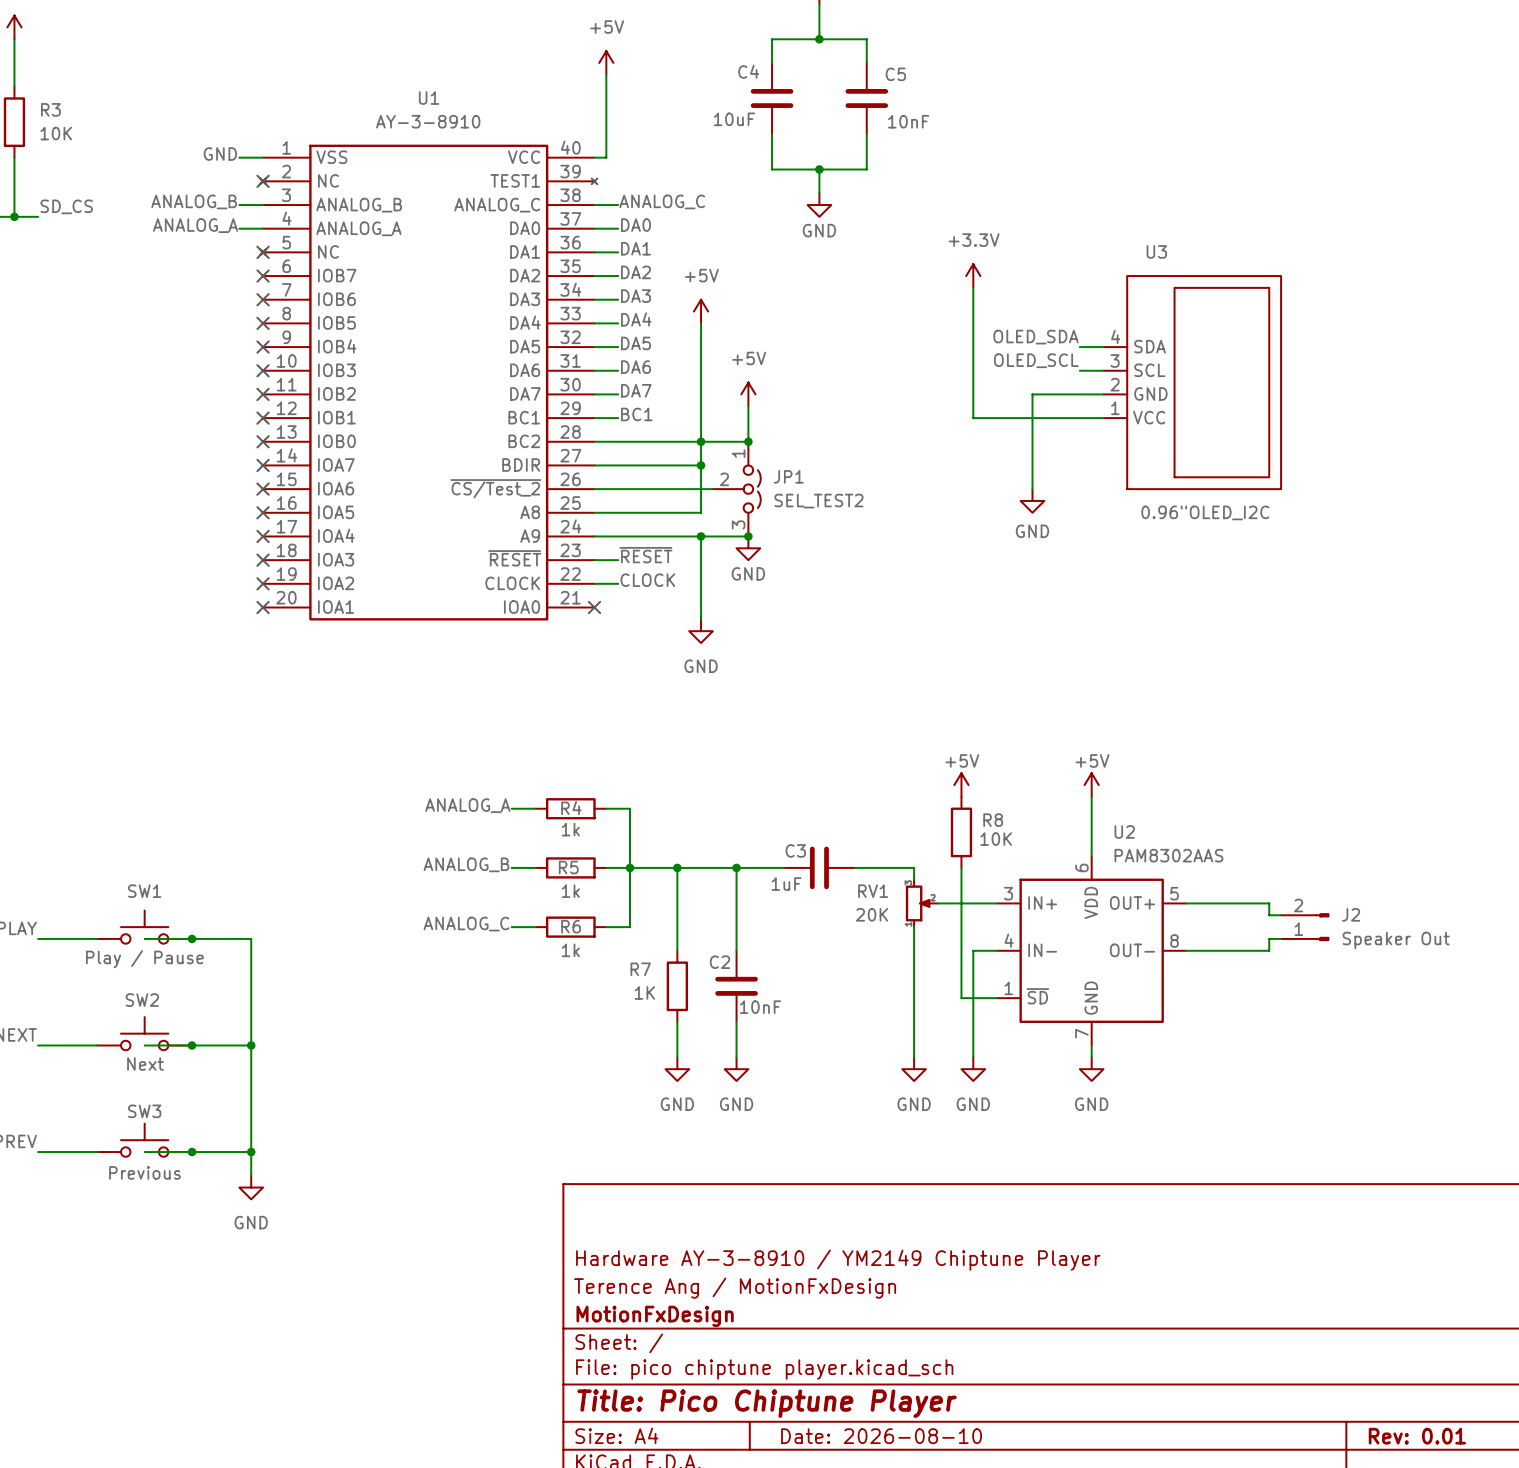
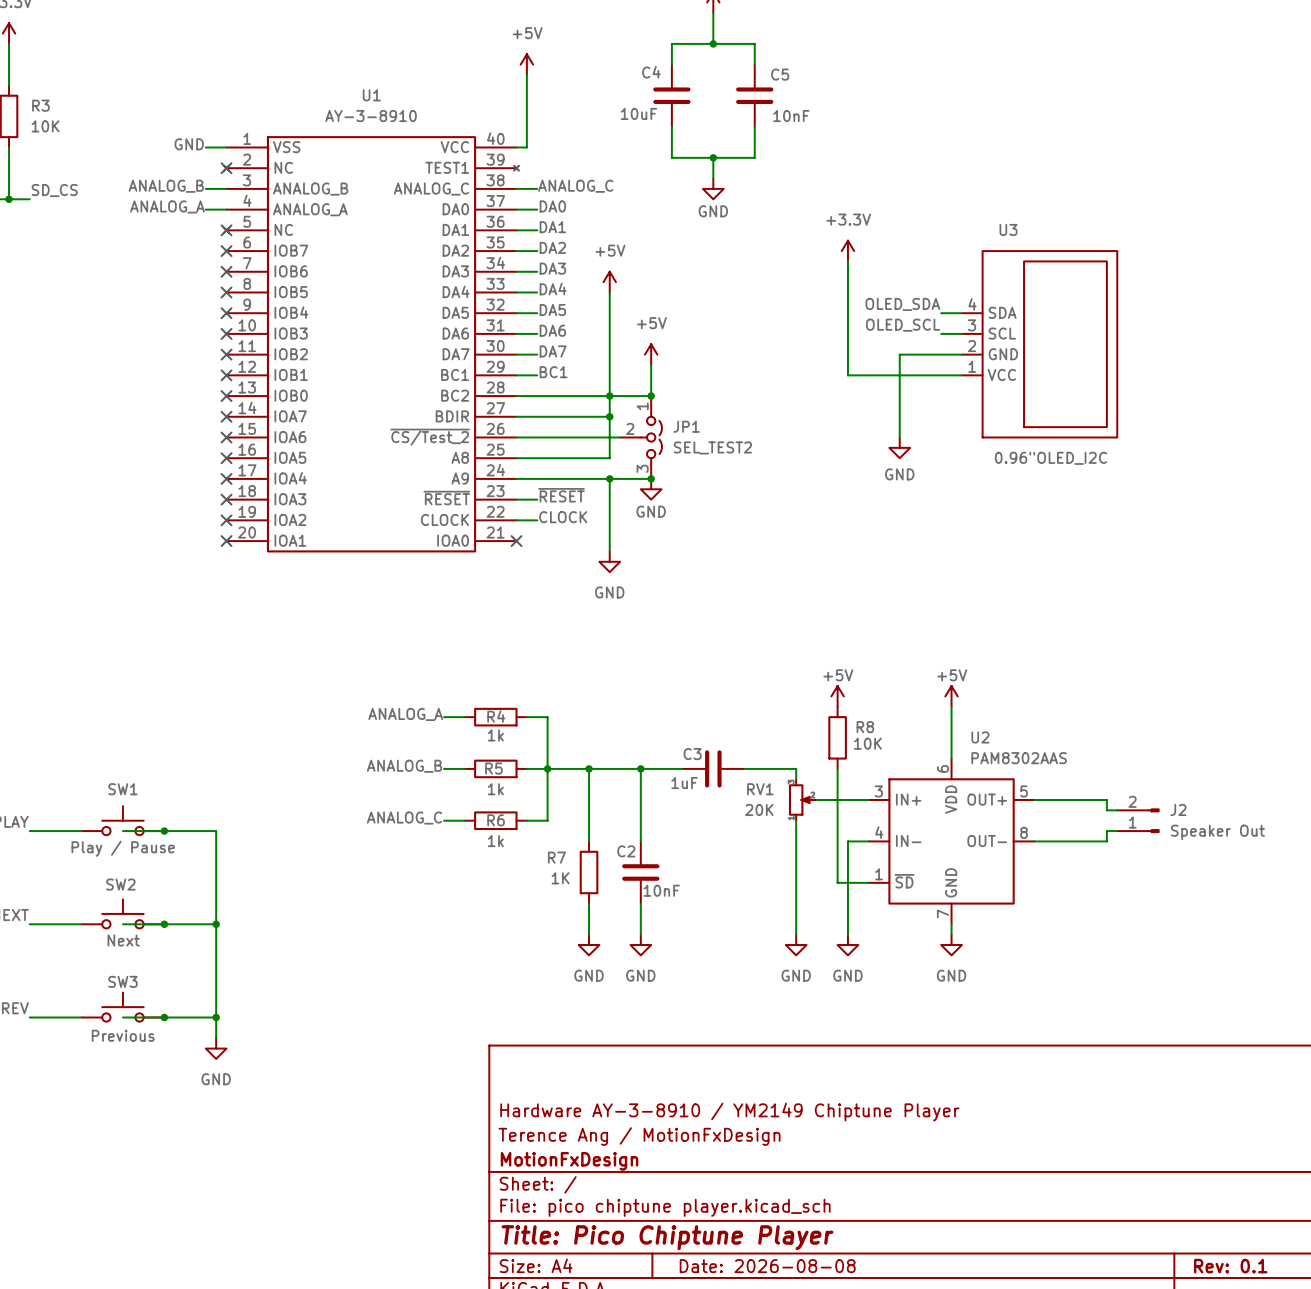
title block: Date: 2026-08-10 (881, 1436) -> Date: 2026-08-08 (767, 1266)
title block: Rev: 0.01 (1417, 1436) -> Rev: 0.1 (1230, 1266)

